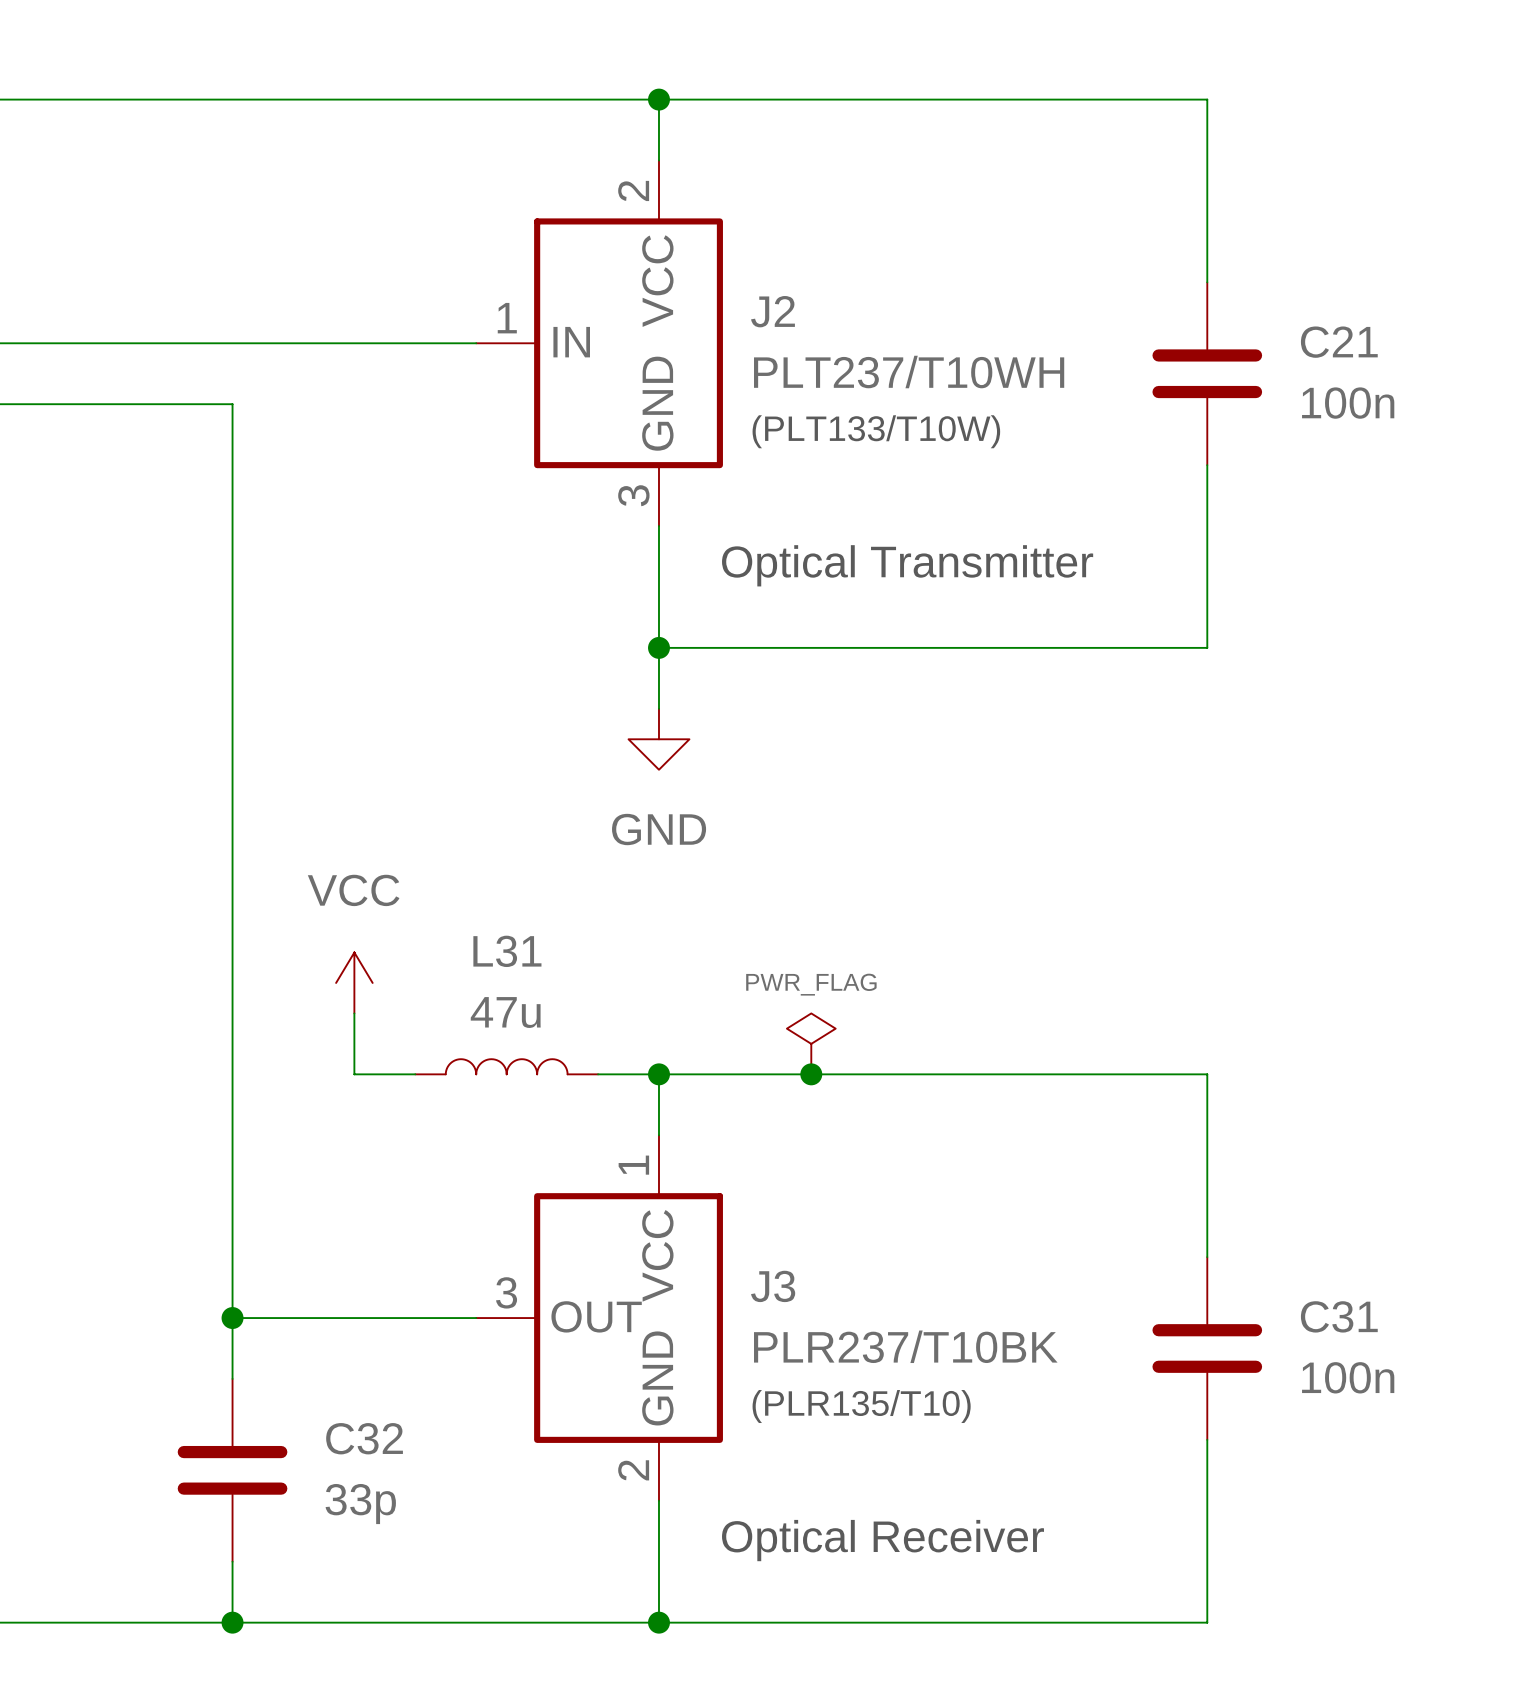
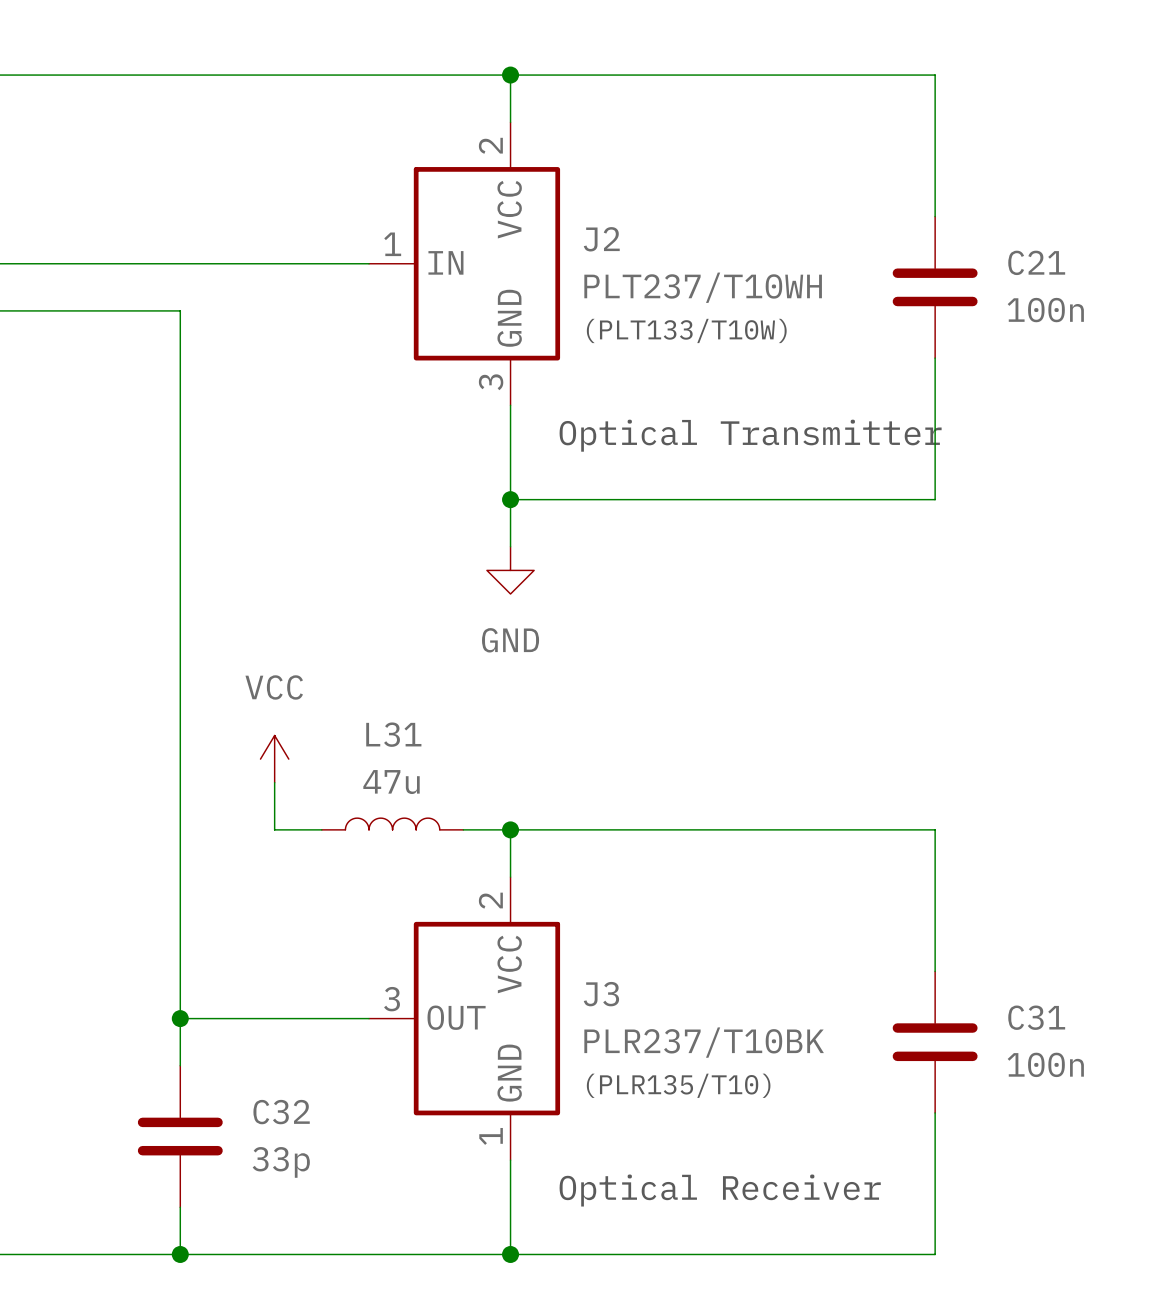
power symbol: PWR_FLAG (811, 1043) -> none
junction: (811, 1074) -> none
J3 pin number: 1 (633, 1165) -> 2 (490, 900)
J3 pin number: 2 (633, 1470) -> 1 (491, 1136)

